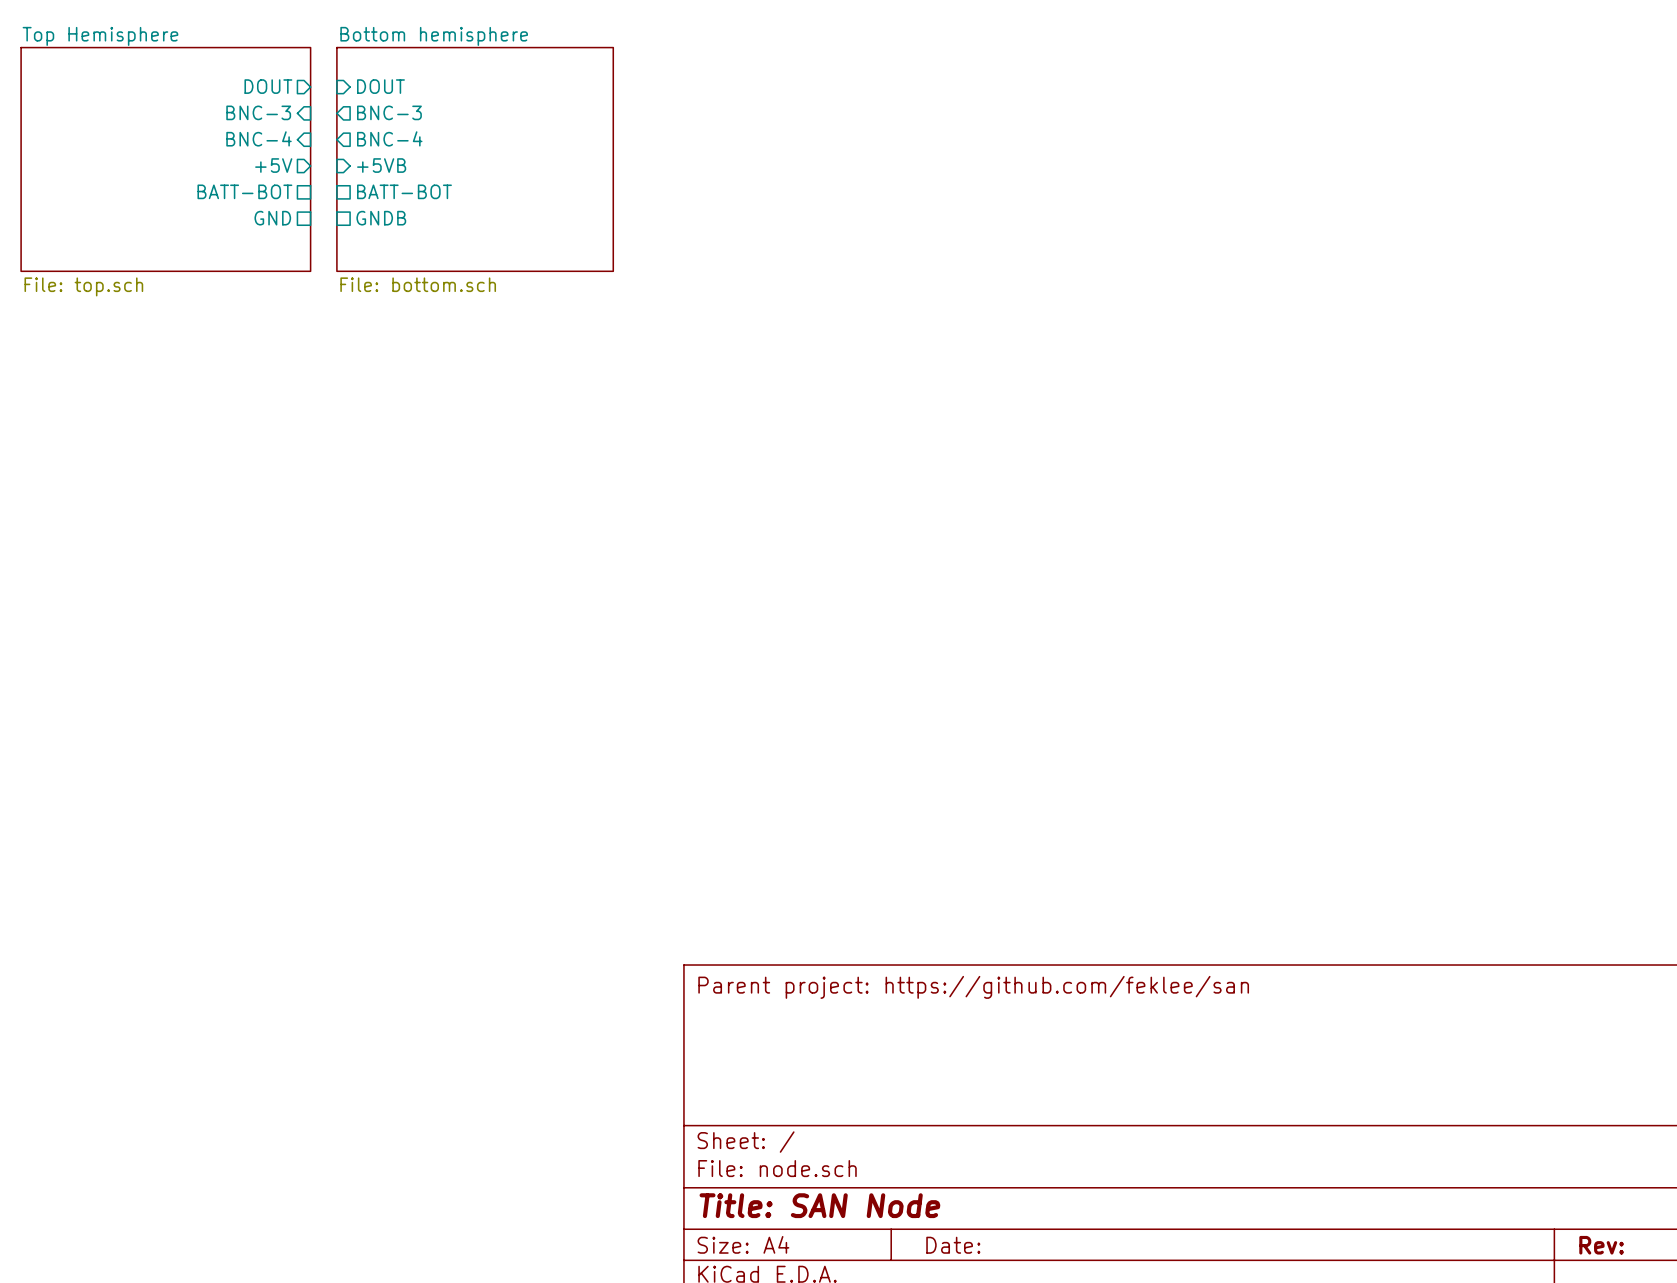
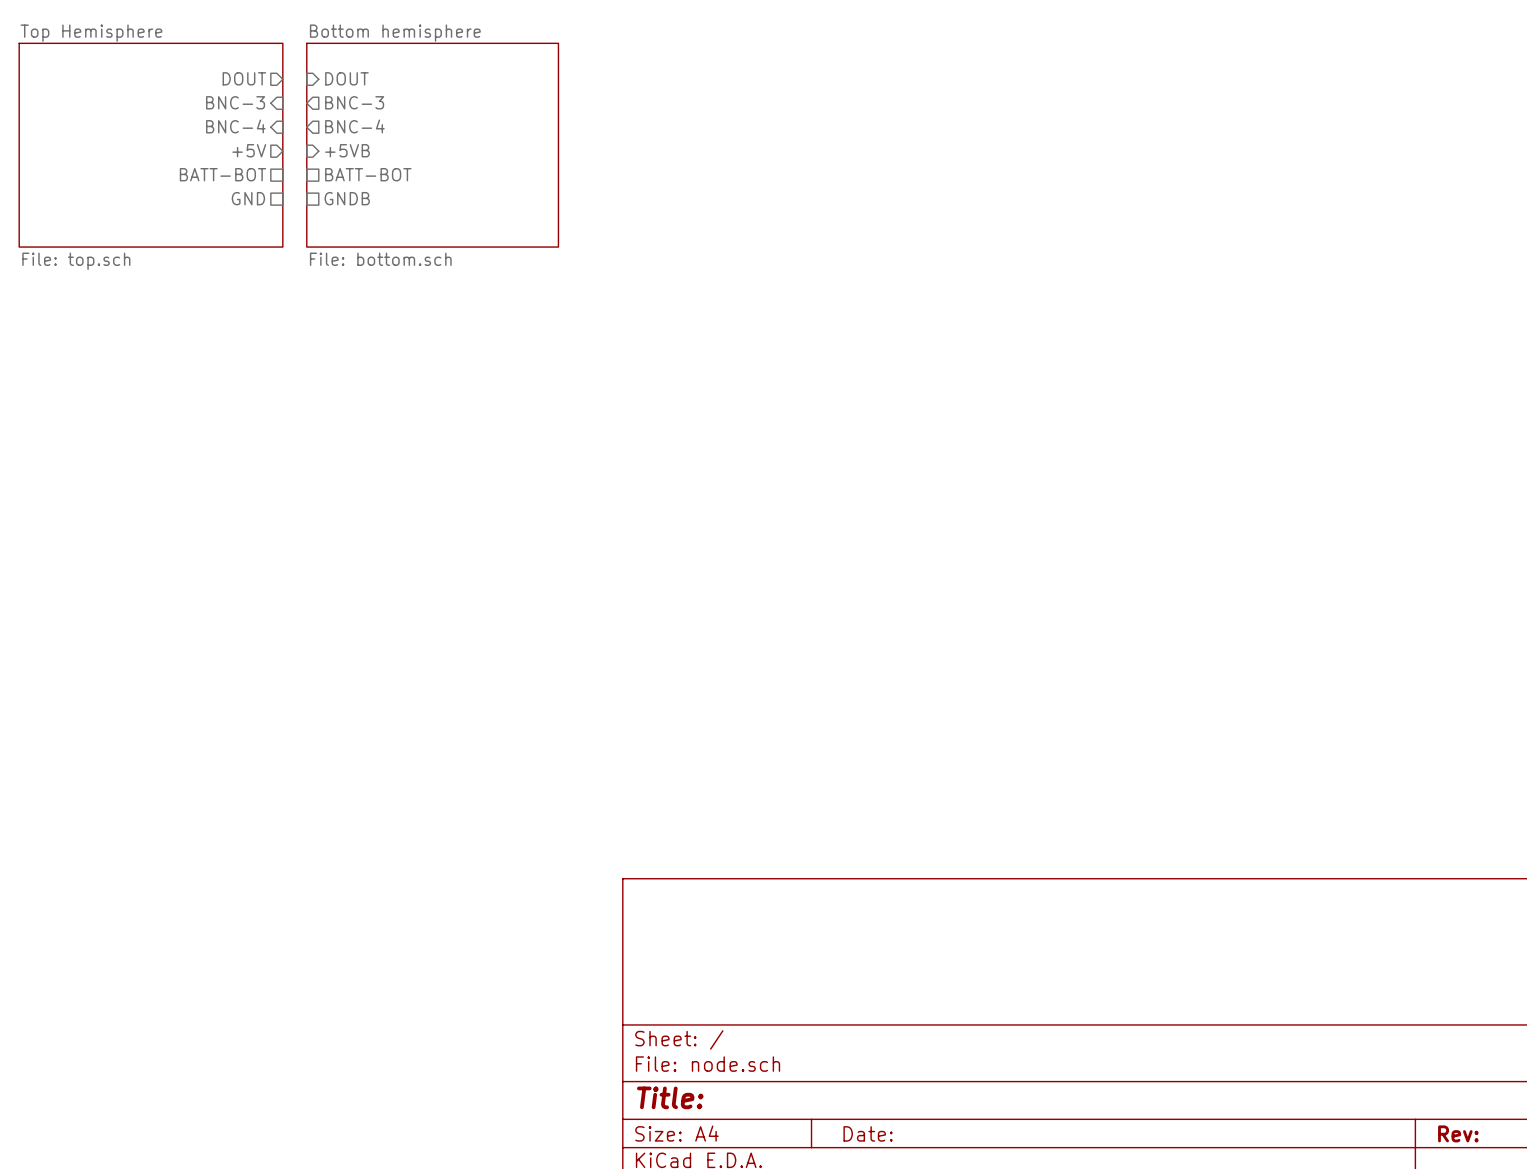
title block: Parent project: https://github.com/feklee/san (973, 987) -> none
title block: Title: SAN Node (819, 1205) -> Title: (670, 1097)

